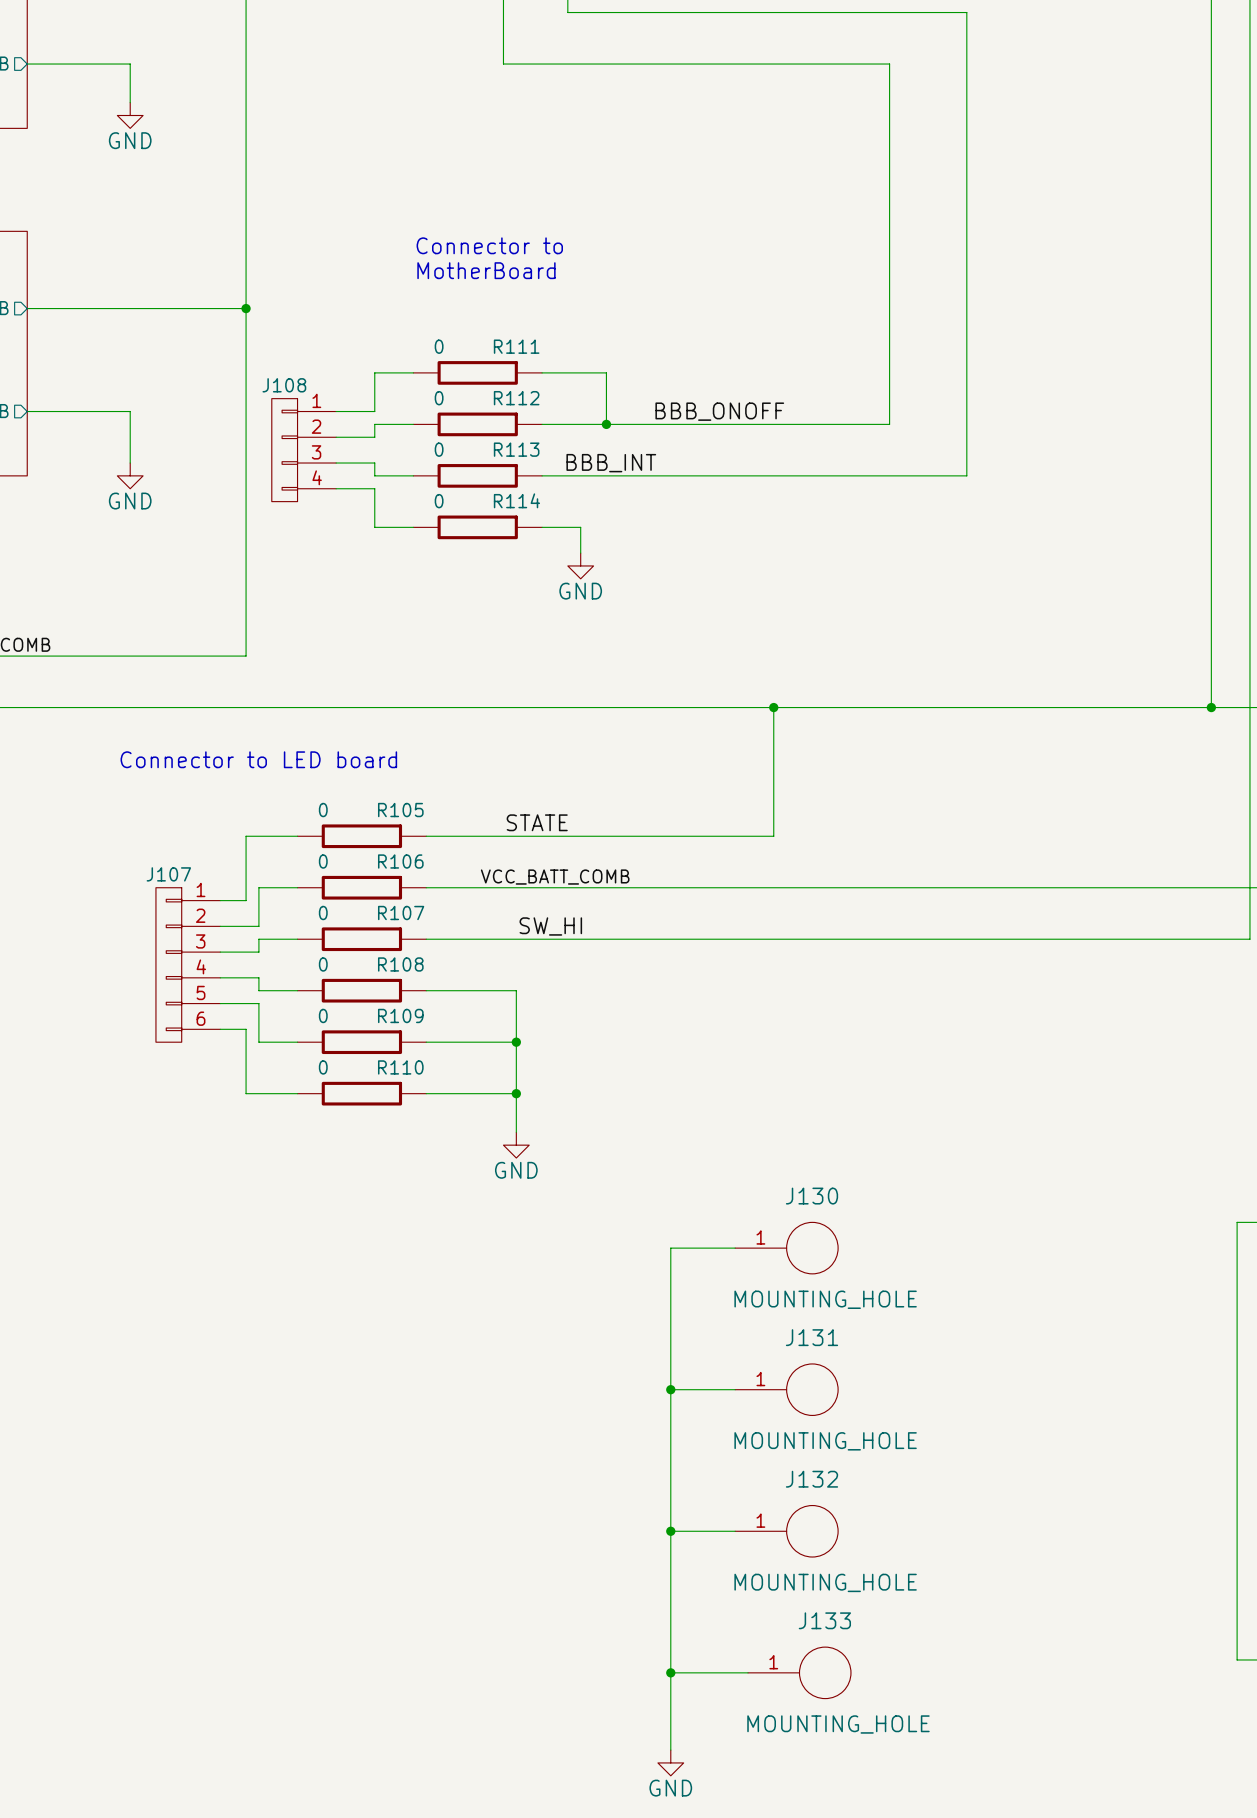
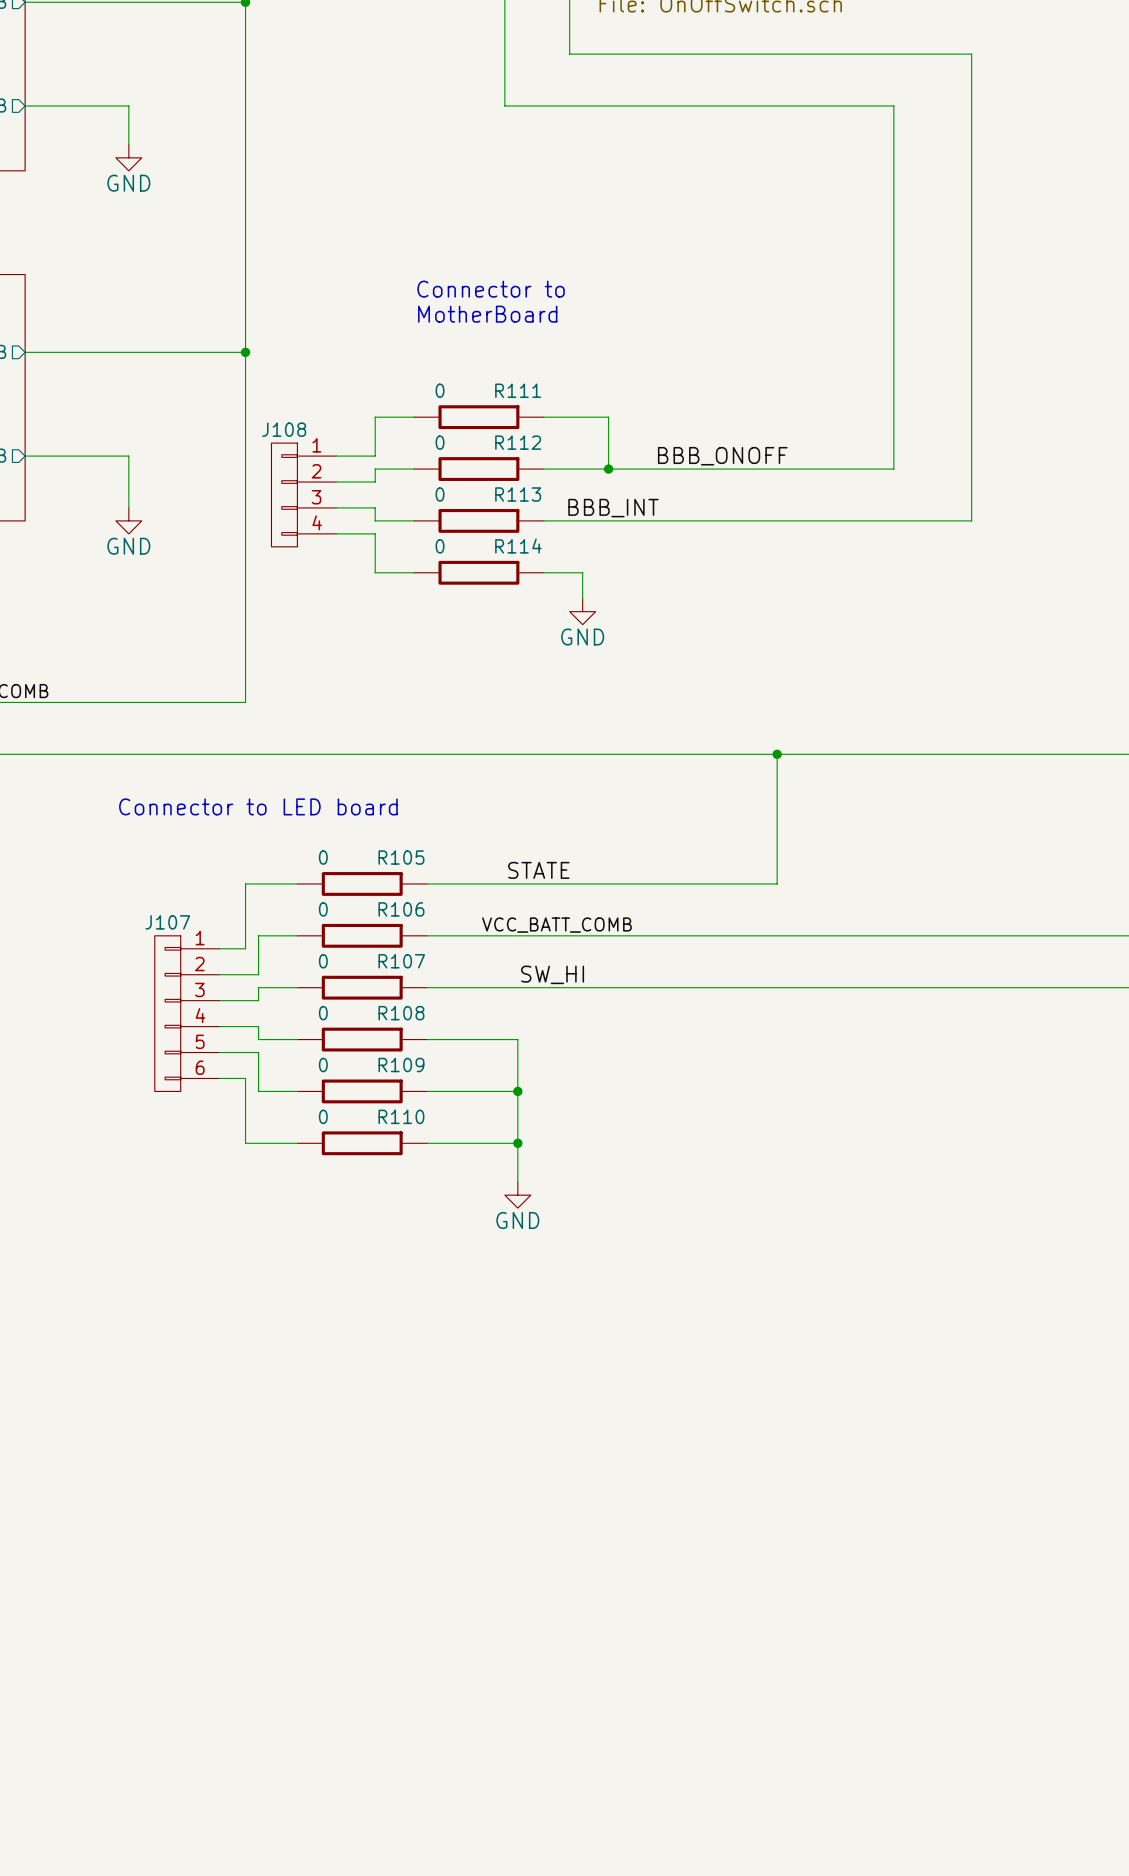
wire: (735, 1248) (670, 1248) (670, 1750) -> none
J130: MOUNTING_HOLE (786, 1248) -> none
wire: (670, 1389) (735, 1389) -> none
junction: (670, 1389) -> none
J131: MOUNTING_HOLE (786, 1389) -> none
wire: (670, 1531) (735, 1531) -> none
junction: (670, 1531) -> none
J132: MOUNTING_HOLE (786, 1531) -> none
wire: (670, 1672) (748, 1672) -> none
junction: (670, 1672) -> none
J133: MOUNTING_HOLE (799, 1672) -> none
power symbol: GND (670, 1762) -> none

